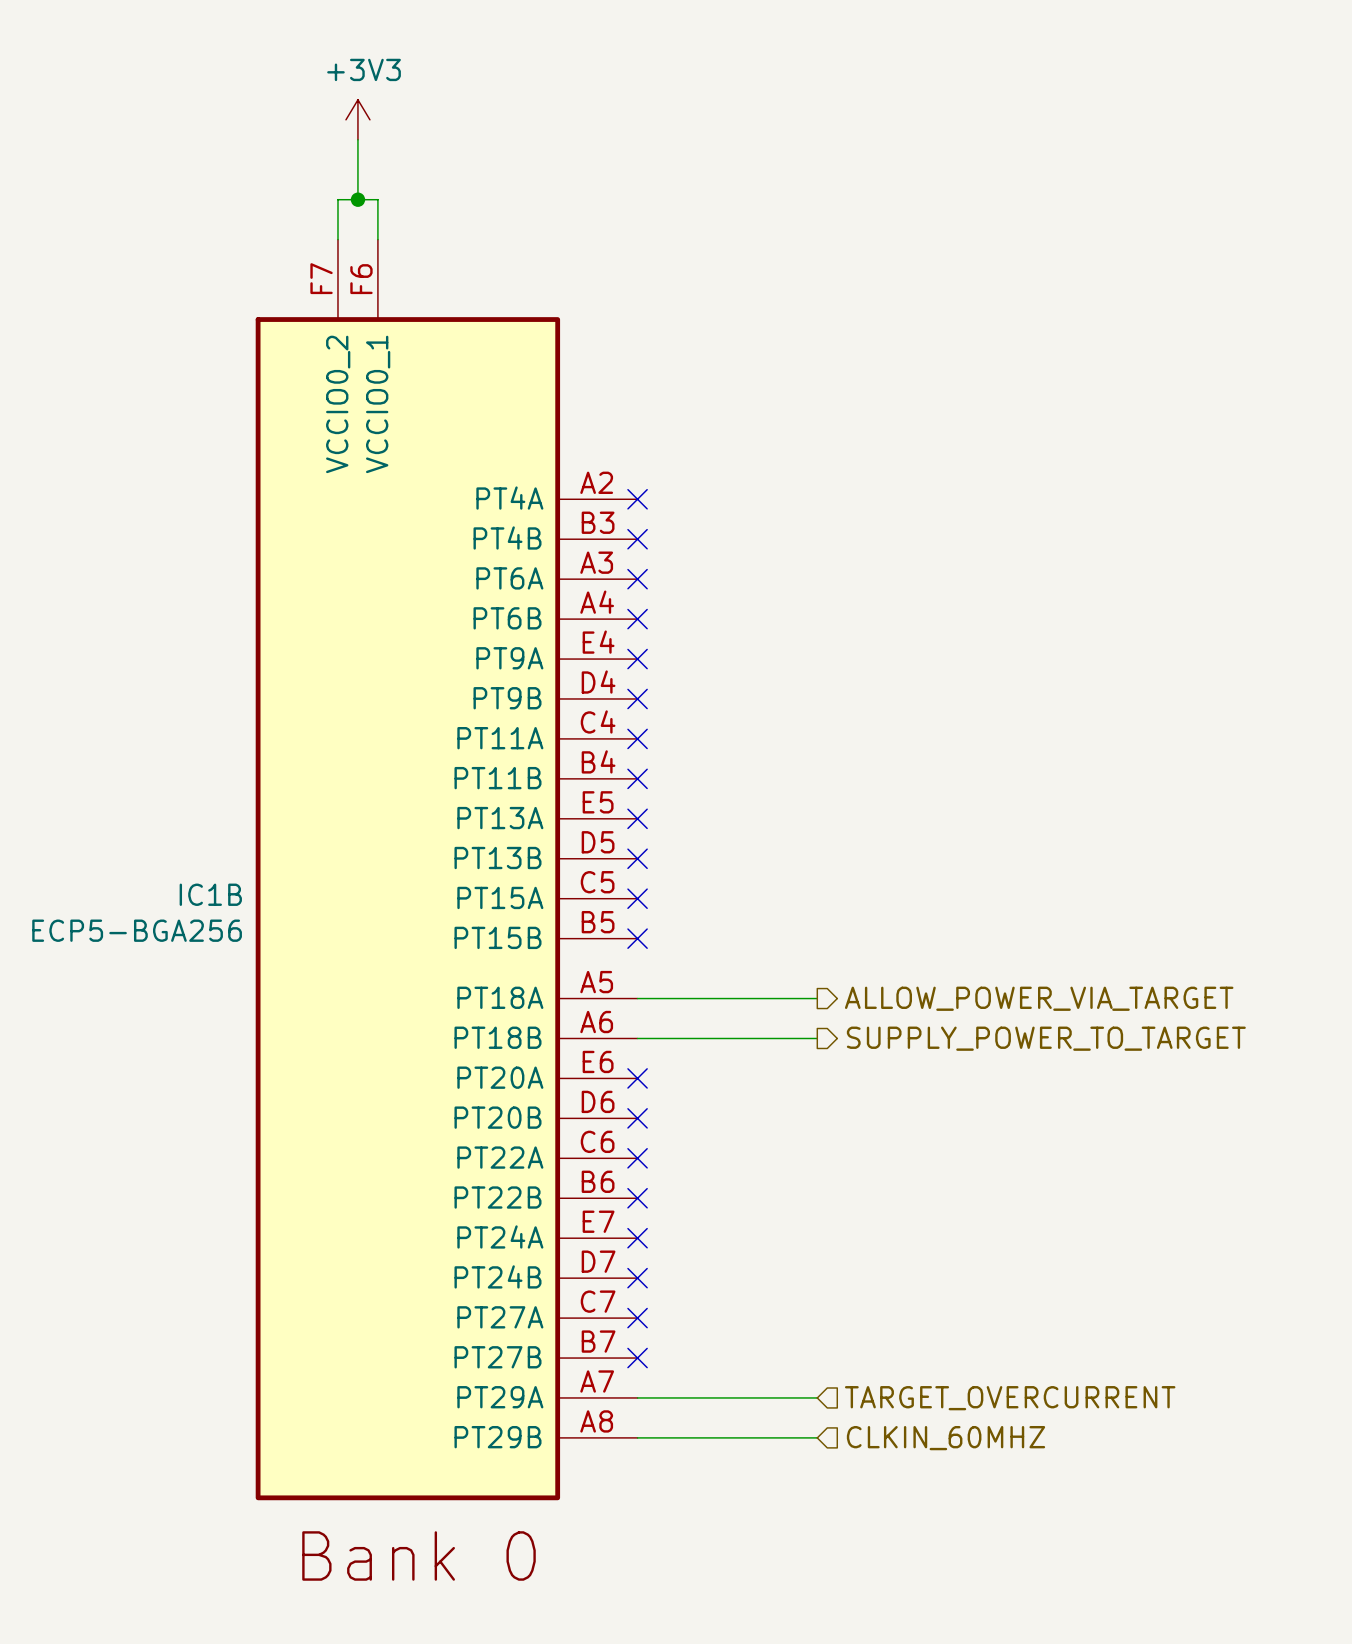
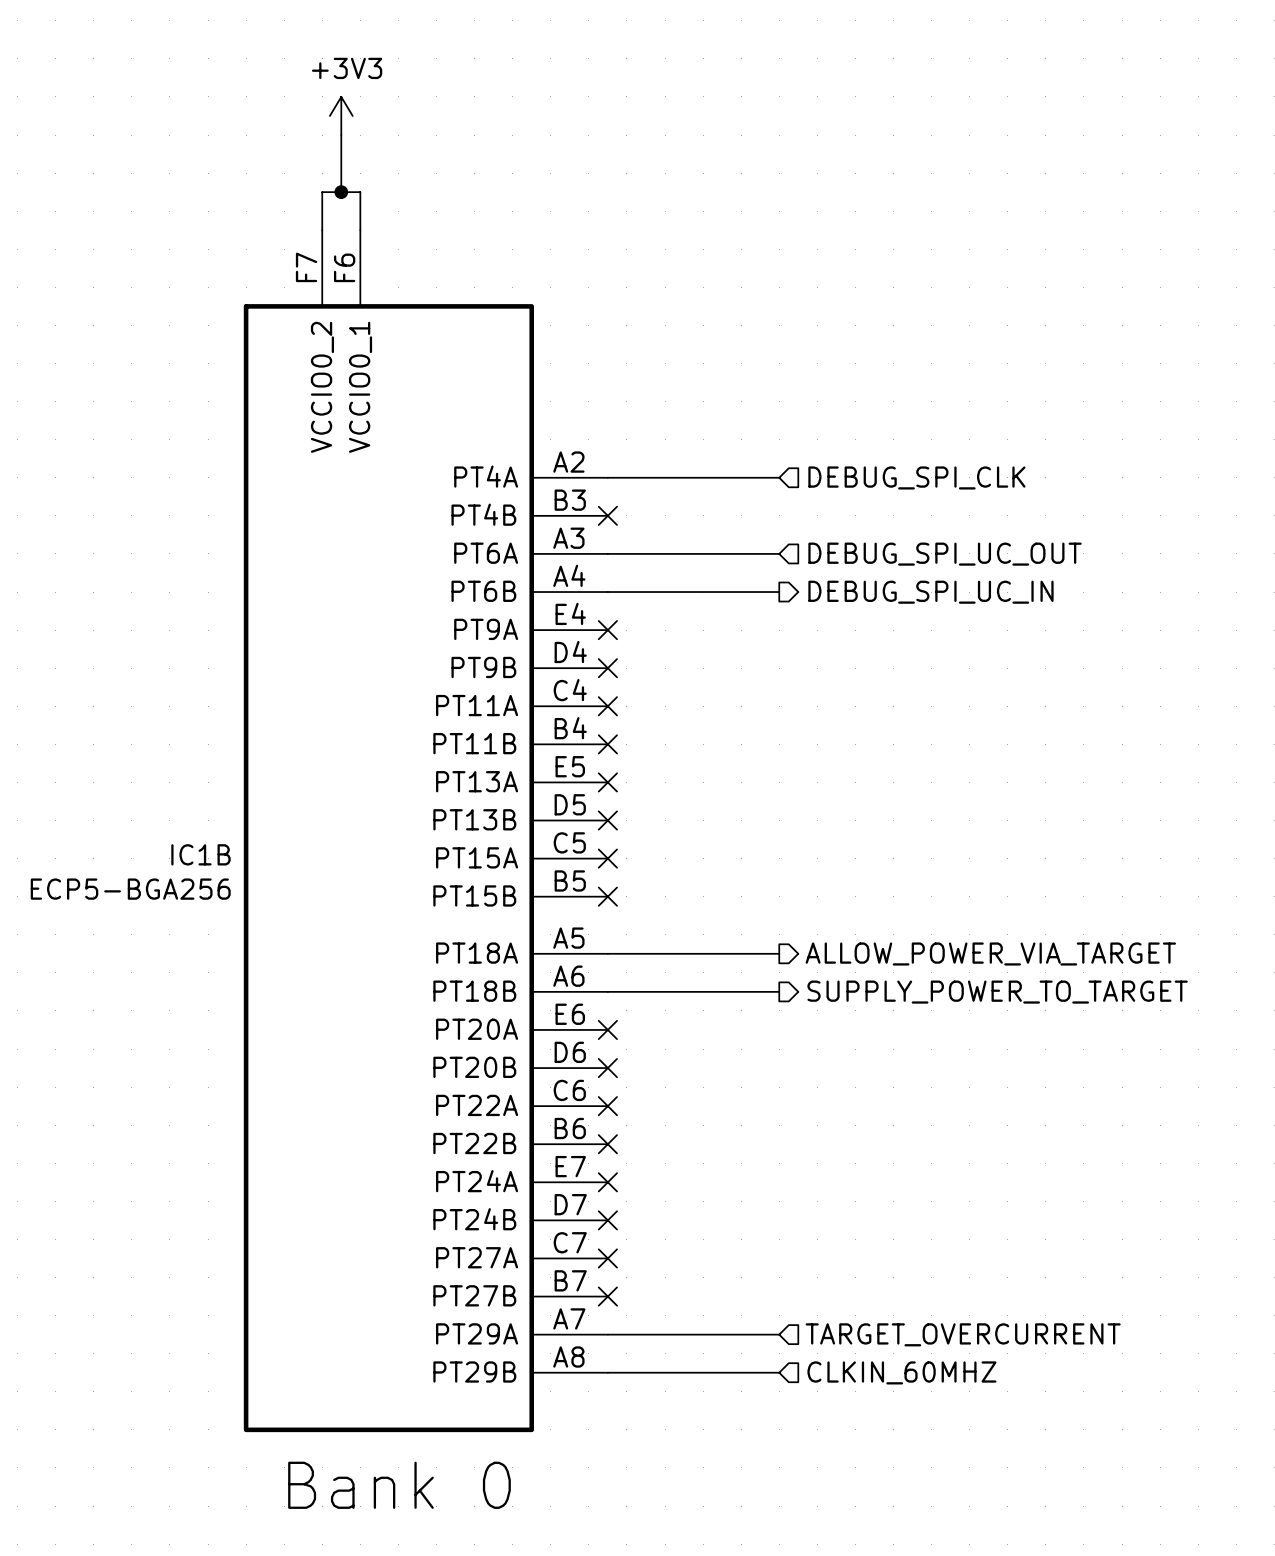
wire: none -> (607, 477) (779, 477)
no-connect mark: (637, 499) -> none
hierarchical label: none -> DEBUG_SPI_CLK (916, 477)
wire: none -> (607, 553) (779, 553)
no-connect mark: (637, 579) -> none
hierarchical label: none -> DEBUG_SPI_UC_OUT (945, 554)
wire: none -> (607, 592) (779, 592)
no-connect mark: (637, 619) -> none
hierarchical label: none -> DEBUG_SPI_UC_IN (930, 592)

